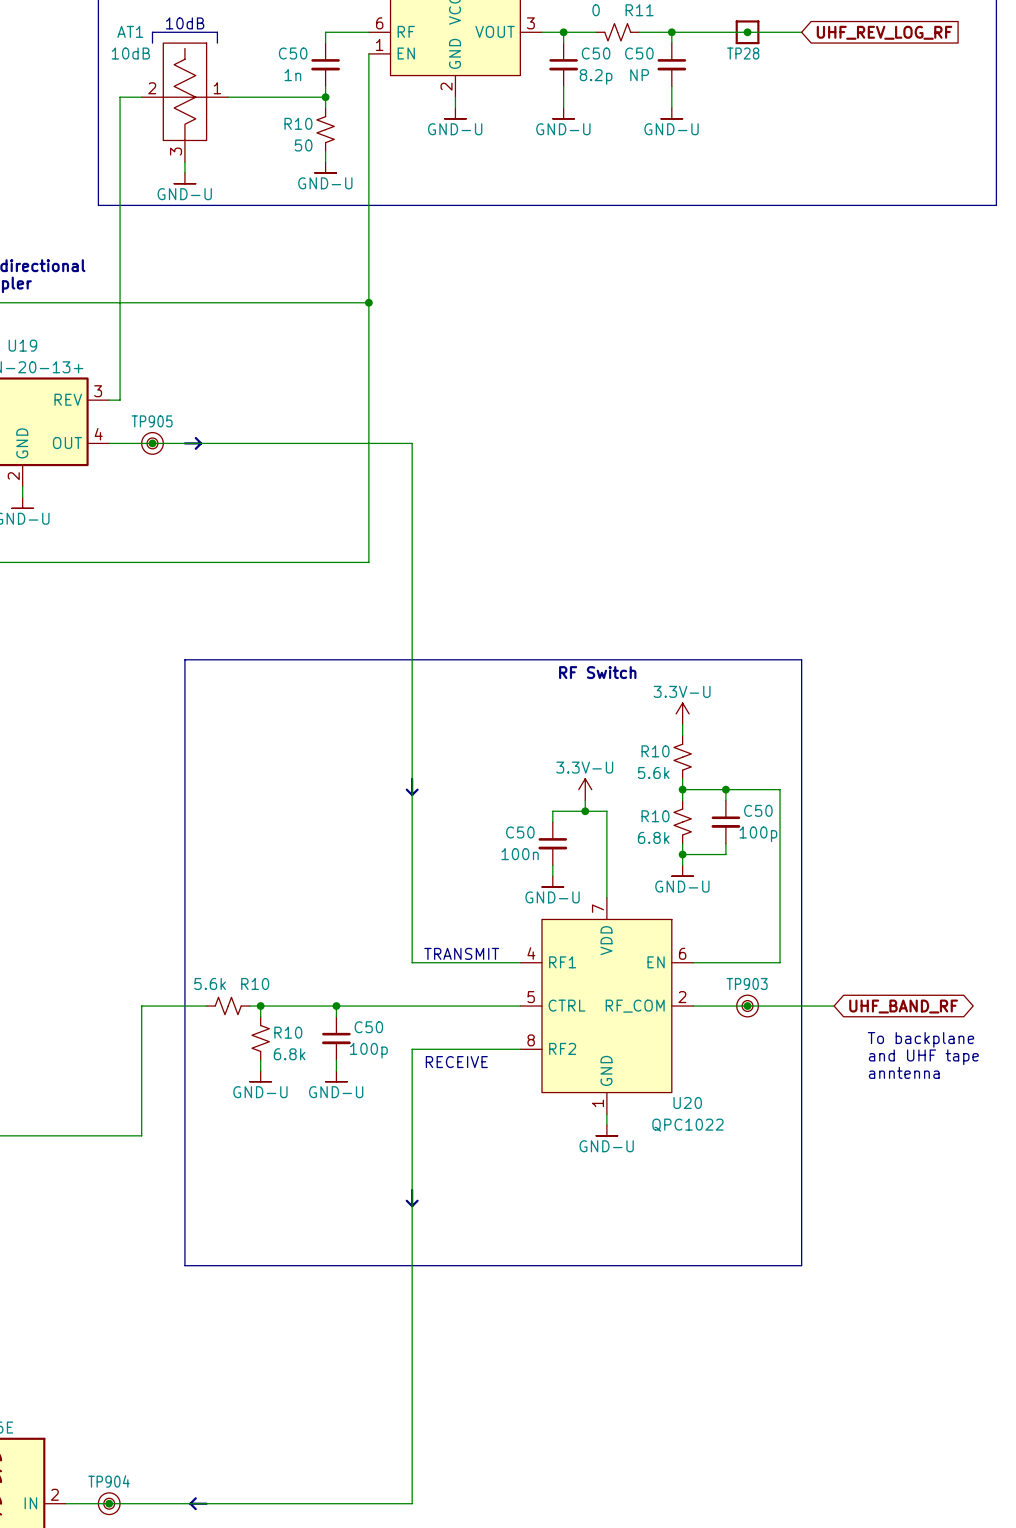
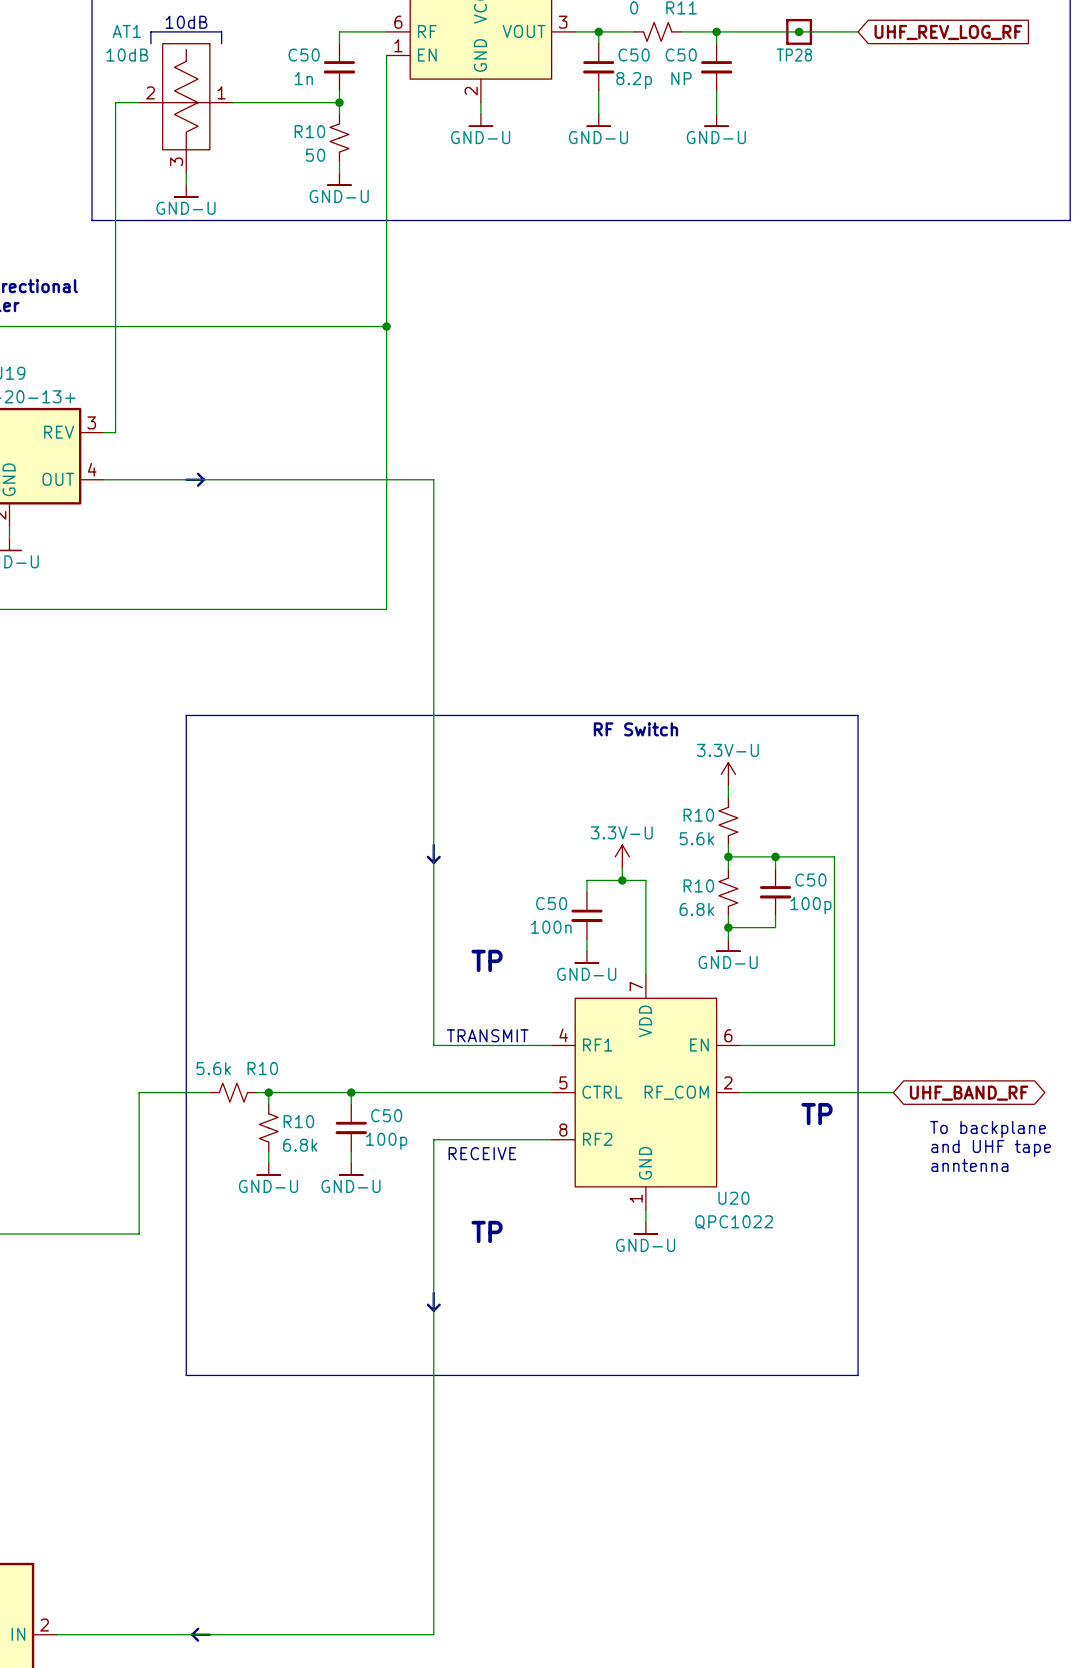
junction: (152, 443) -> none
TP905: (152, 443) -> none
text: none -> TP (487, 960)
junction: (747, 1006) -> none
TP903: (747, 1006) -> none
text: none -> TP (817, 1114)
text: none -> TP (487, 1231)
junction: (109, 1503) -> none
TP904: (109, 1503) -> none

